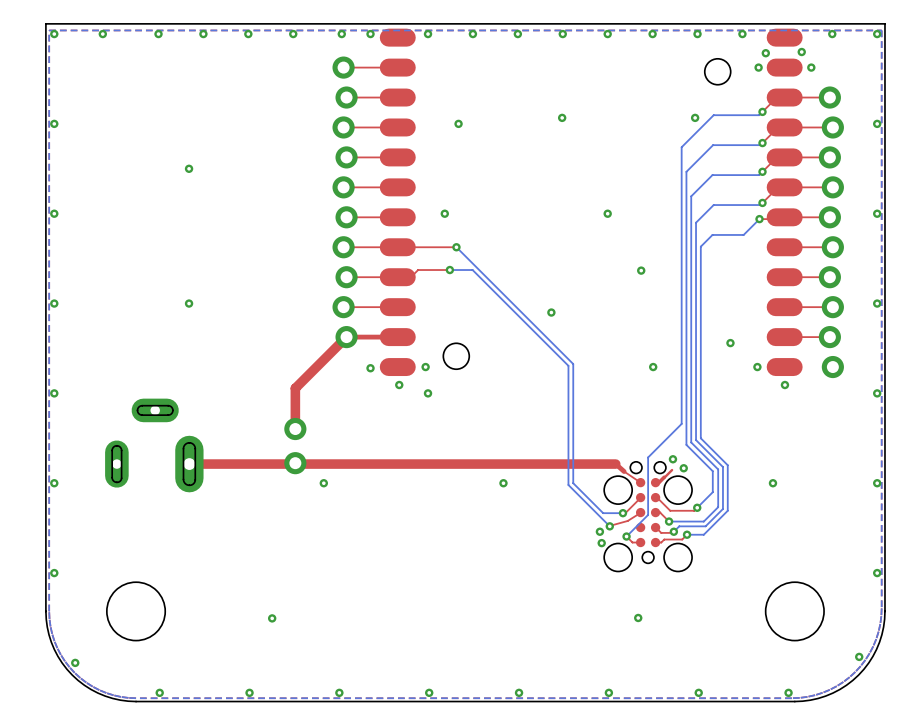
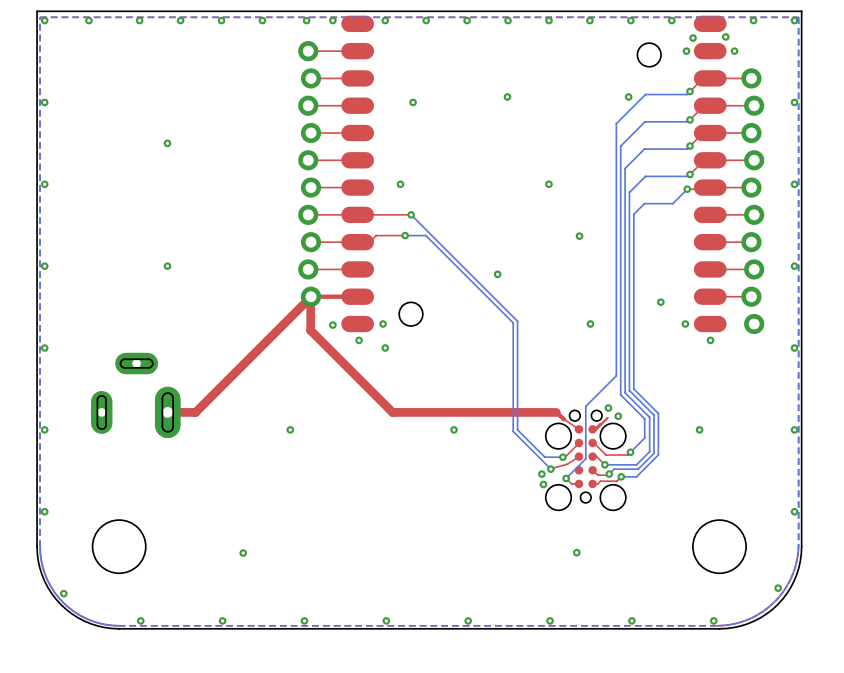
top track: (346, 337) (295, 388) (295, 429) -> (311, 296) (195, 412)
part: (295, 446) -> none
top track: (436, 464) (219, 464) -> (392, 412) (310, 330) (310, 297)

